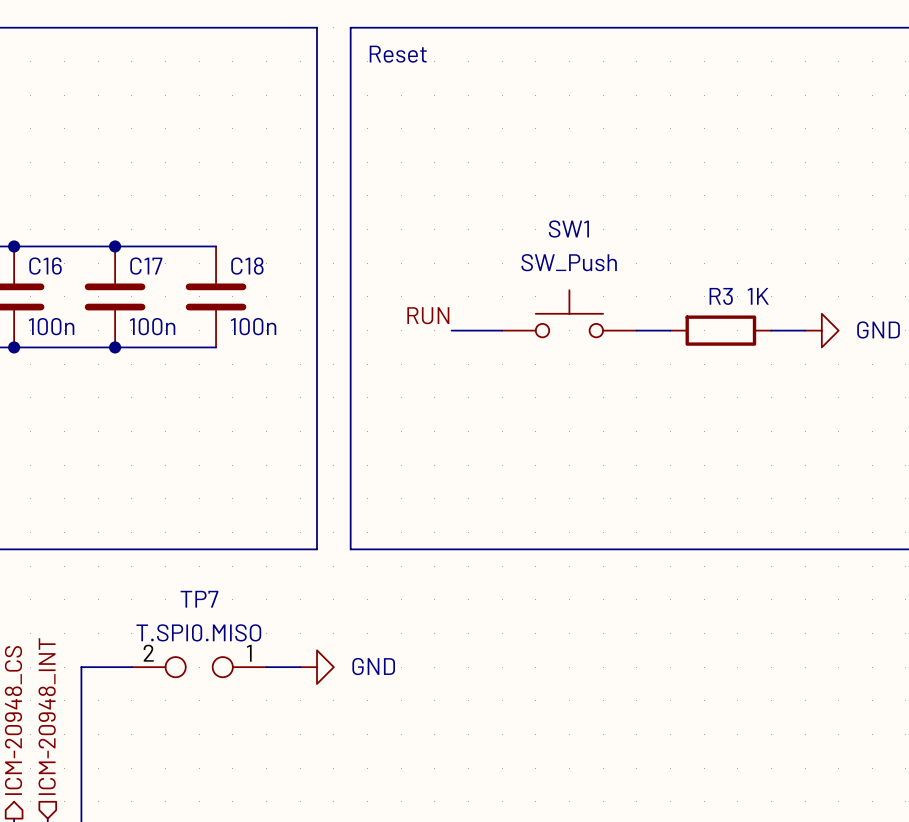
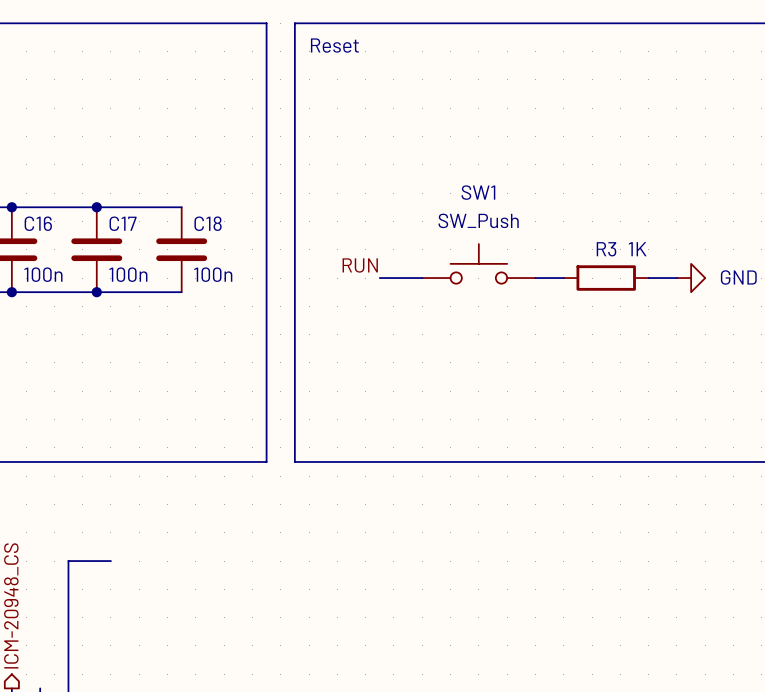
TP7: T.SPI0.MISO (199, 667) -> none
wire: (266, 667) (300, 667) -> none
power symbol: GND (317, 667) -> none
hierarchical label: ICM-20948_INT (47, 716) -> none

